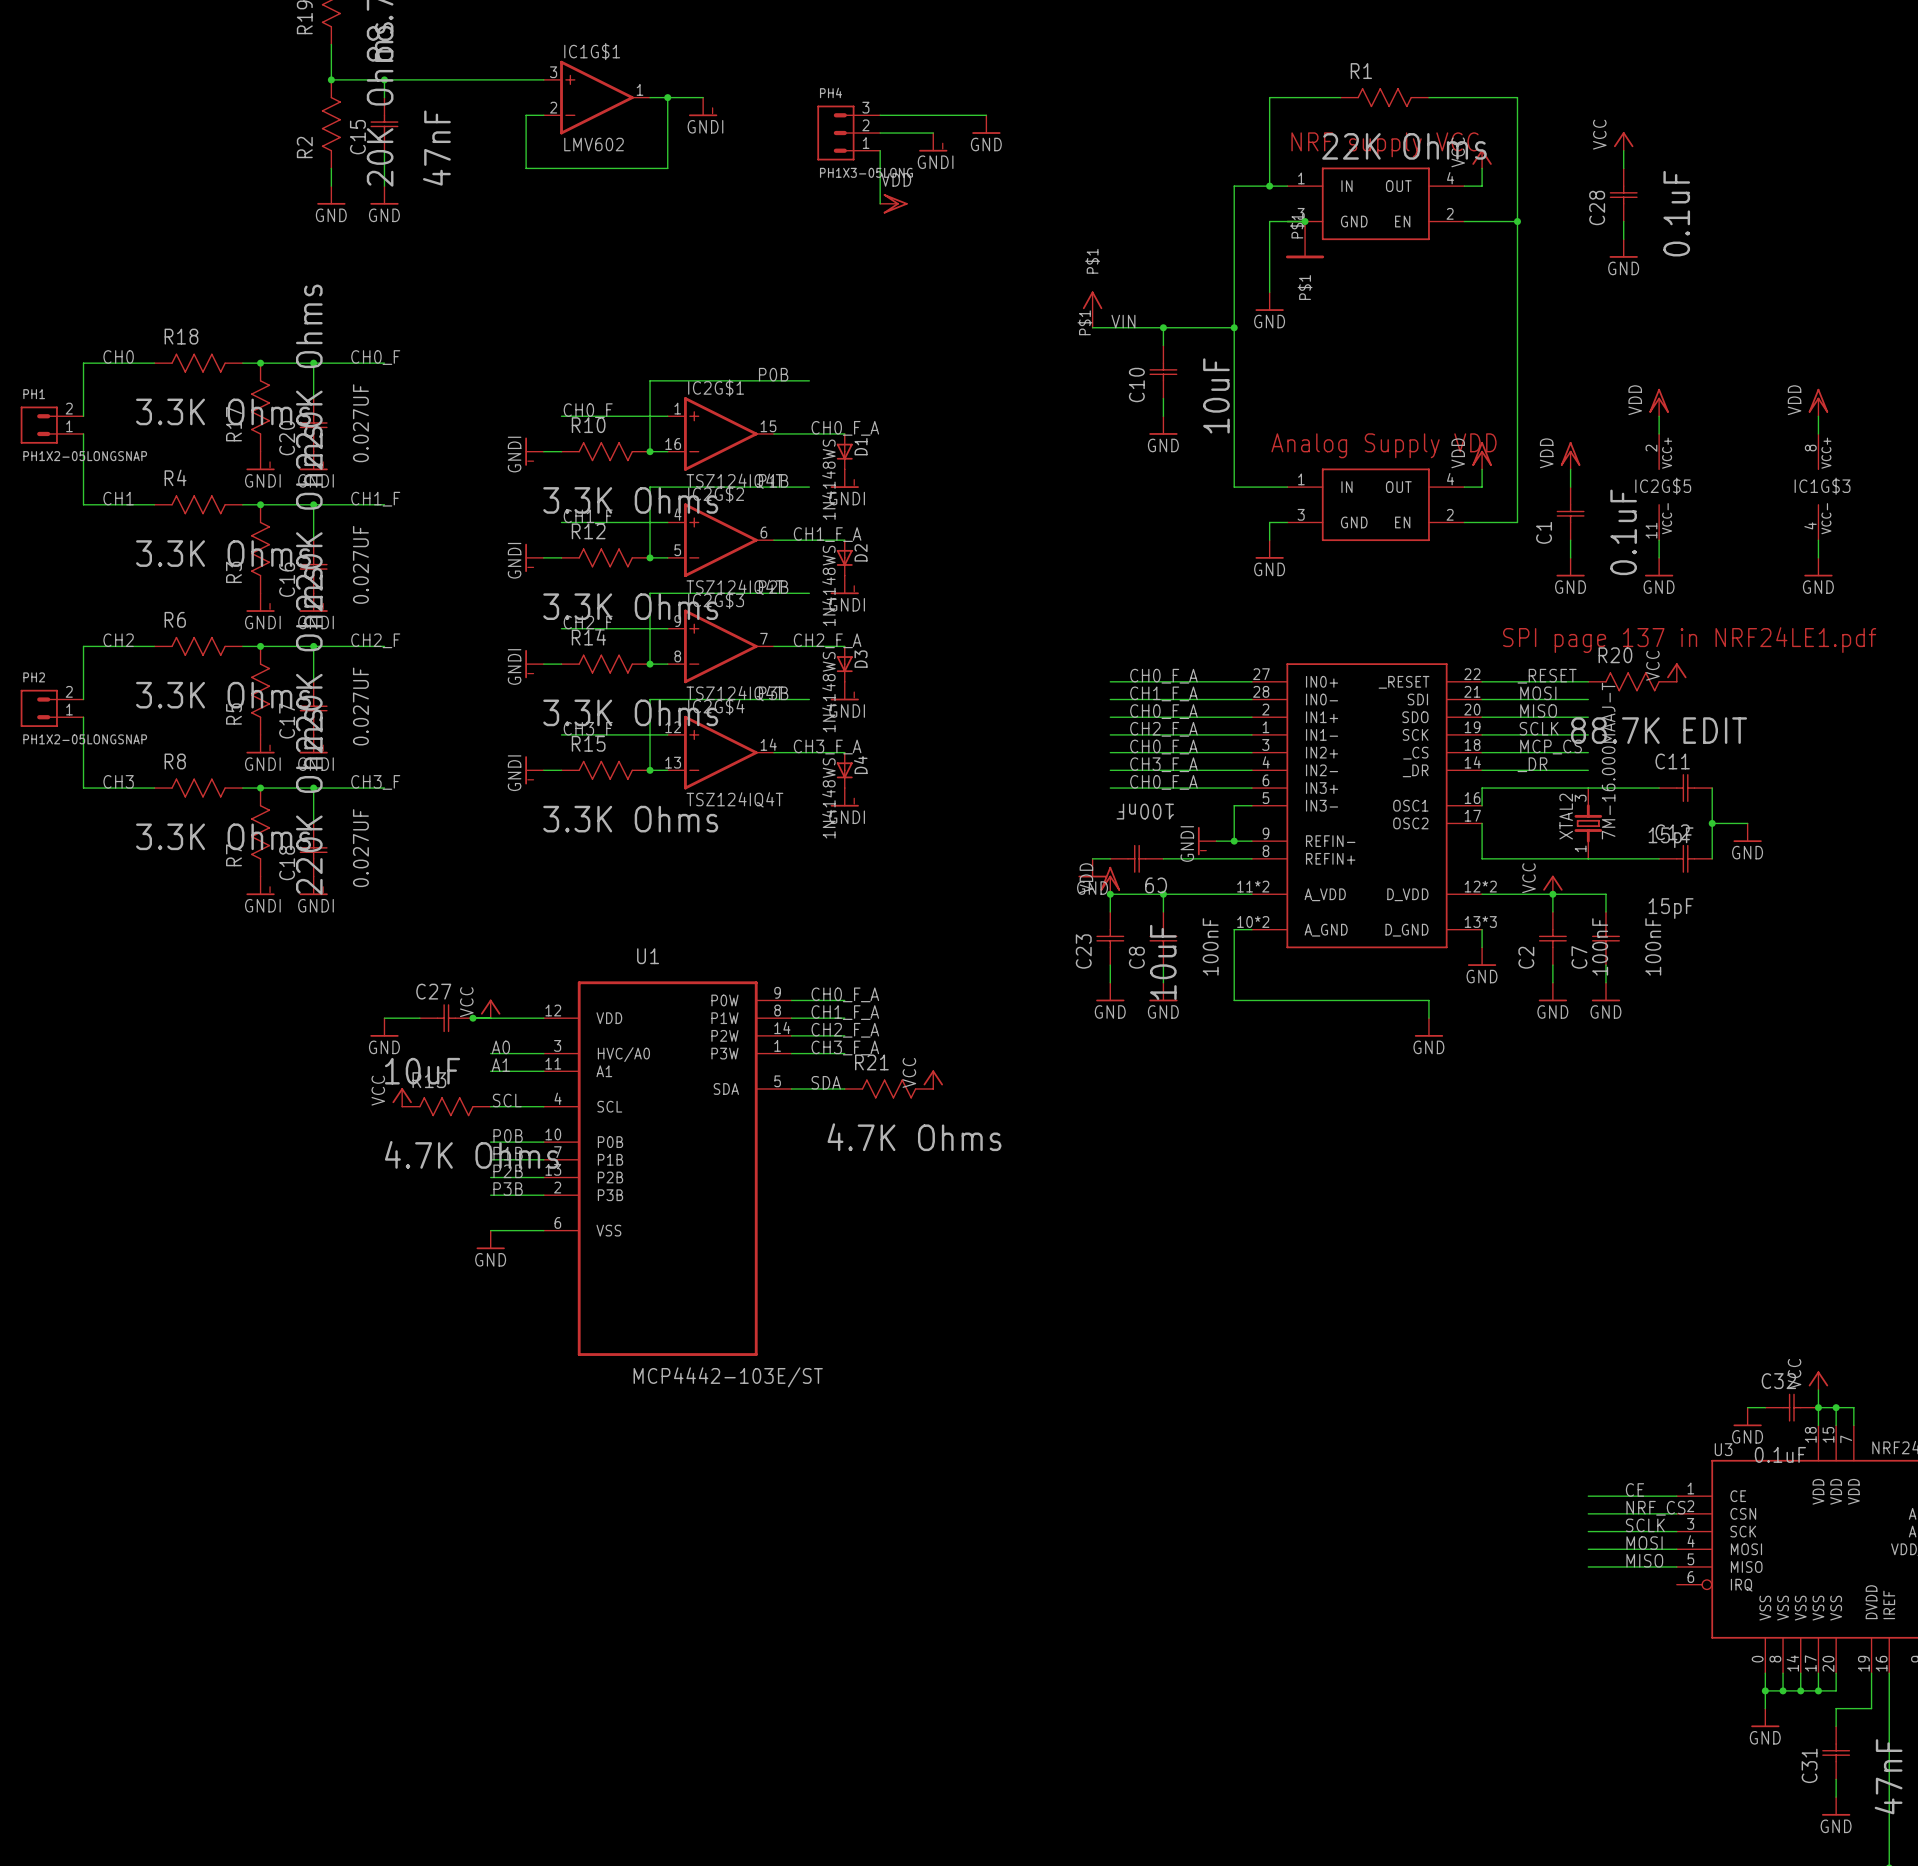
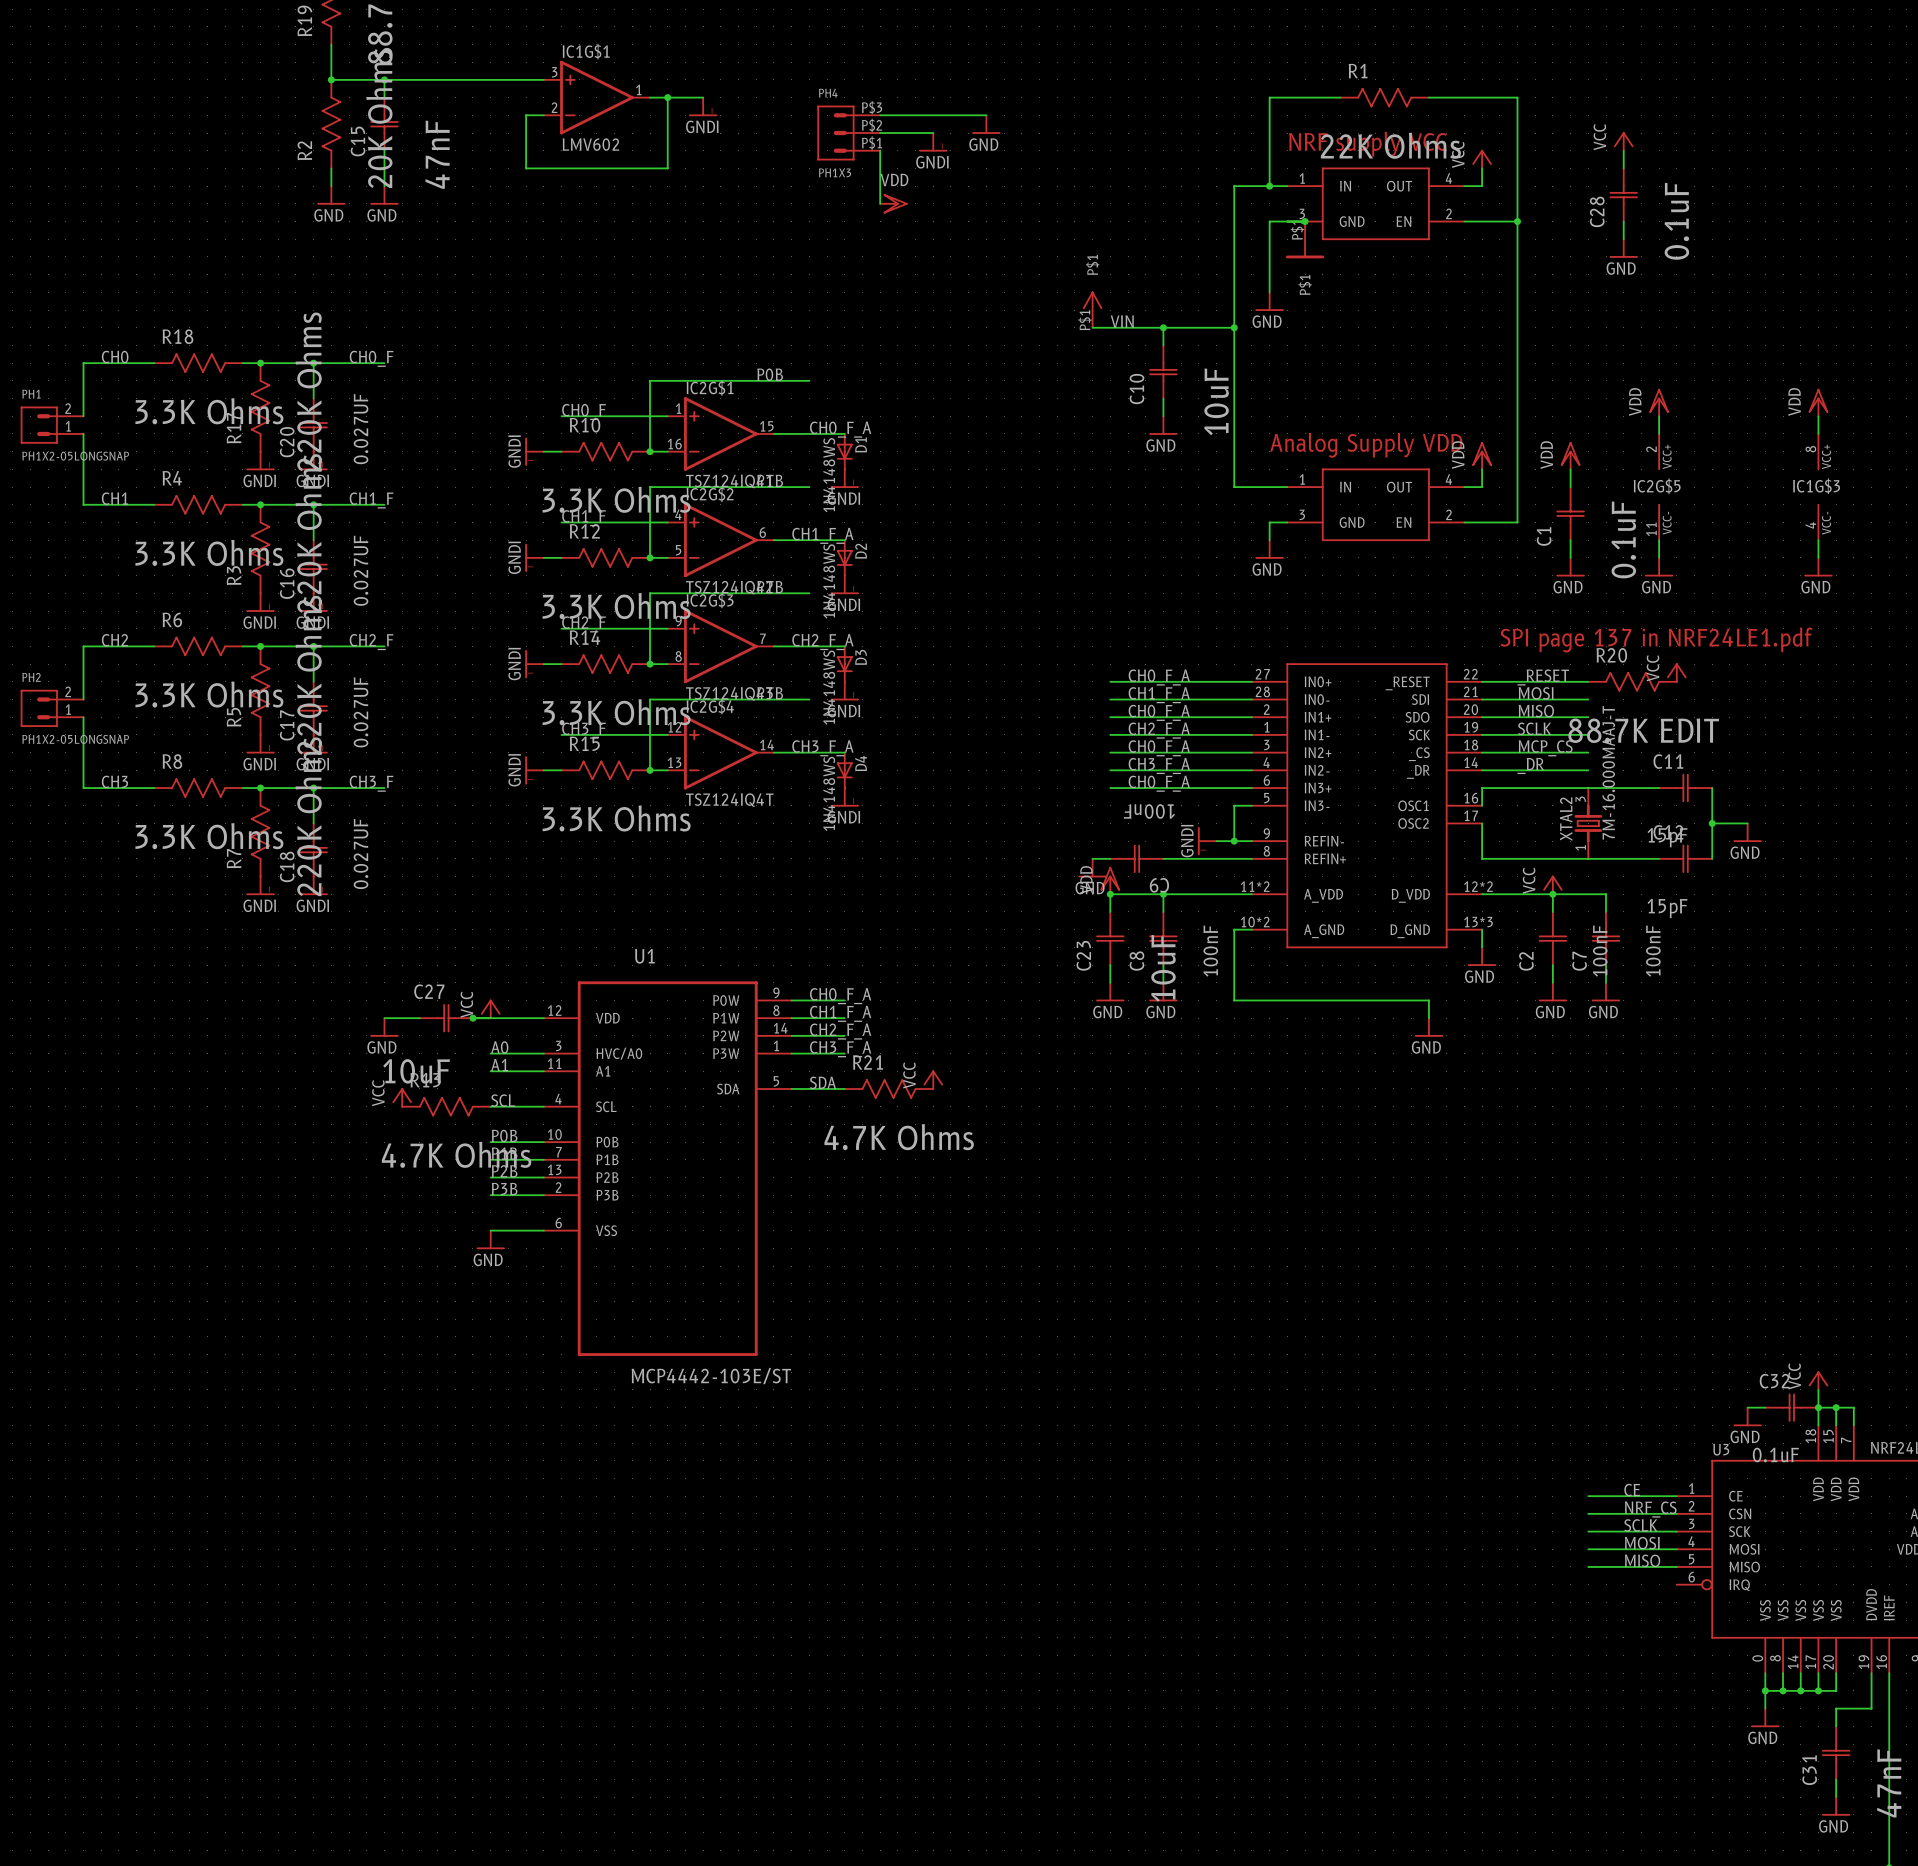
PH4 pin number: 3 (865, 107) -> P$3 (872, 107)
PH4 pin number: 2 (865, 125) -> P$2 (872, 125)
PH4 pin number: 1 (866, 143) -> P$1 (872, 143)
PH4 value: PH1X3-05LONG (866, 172) -> PH1X3 (835, 172)

